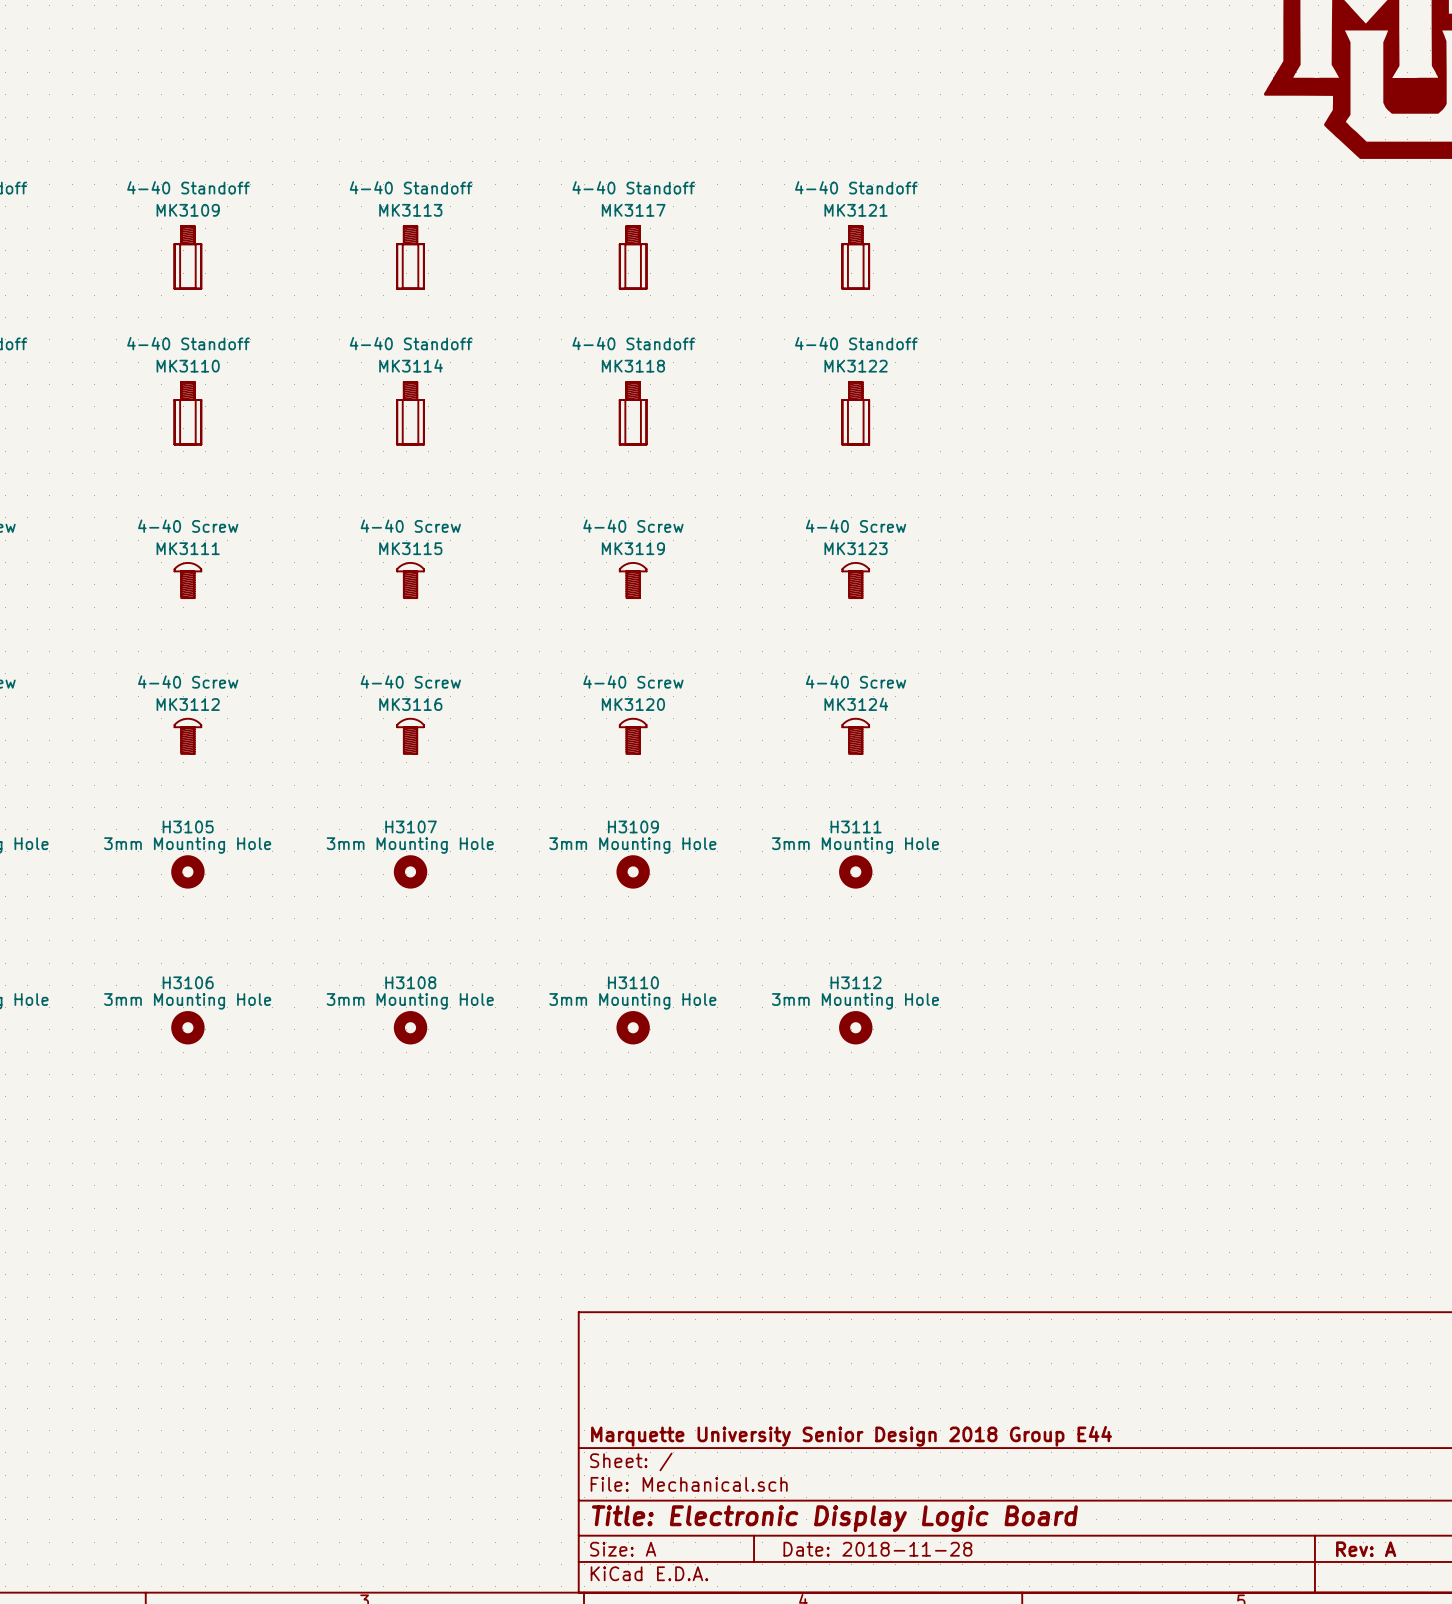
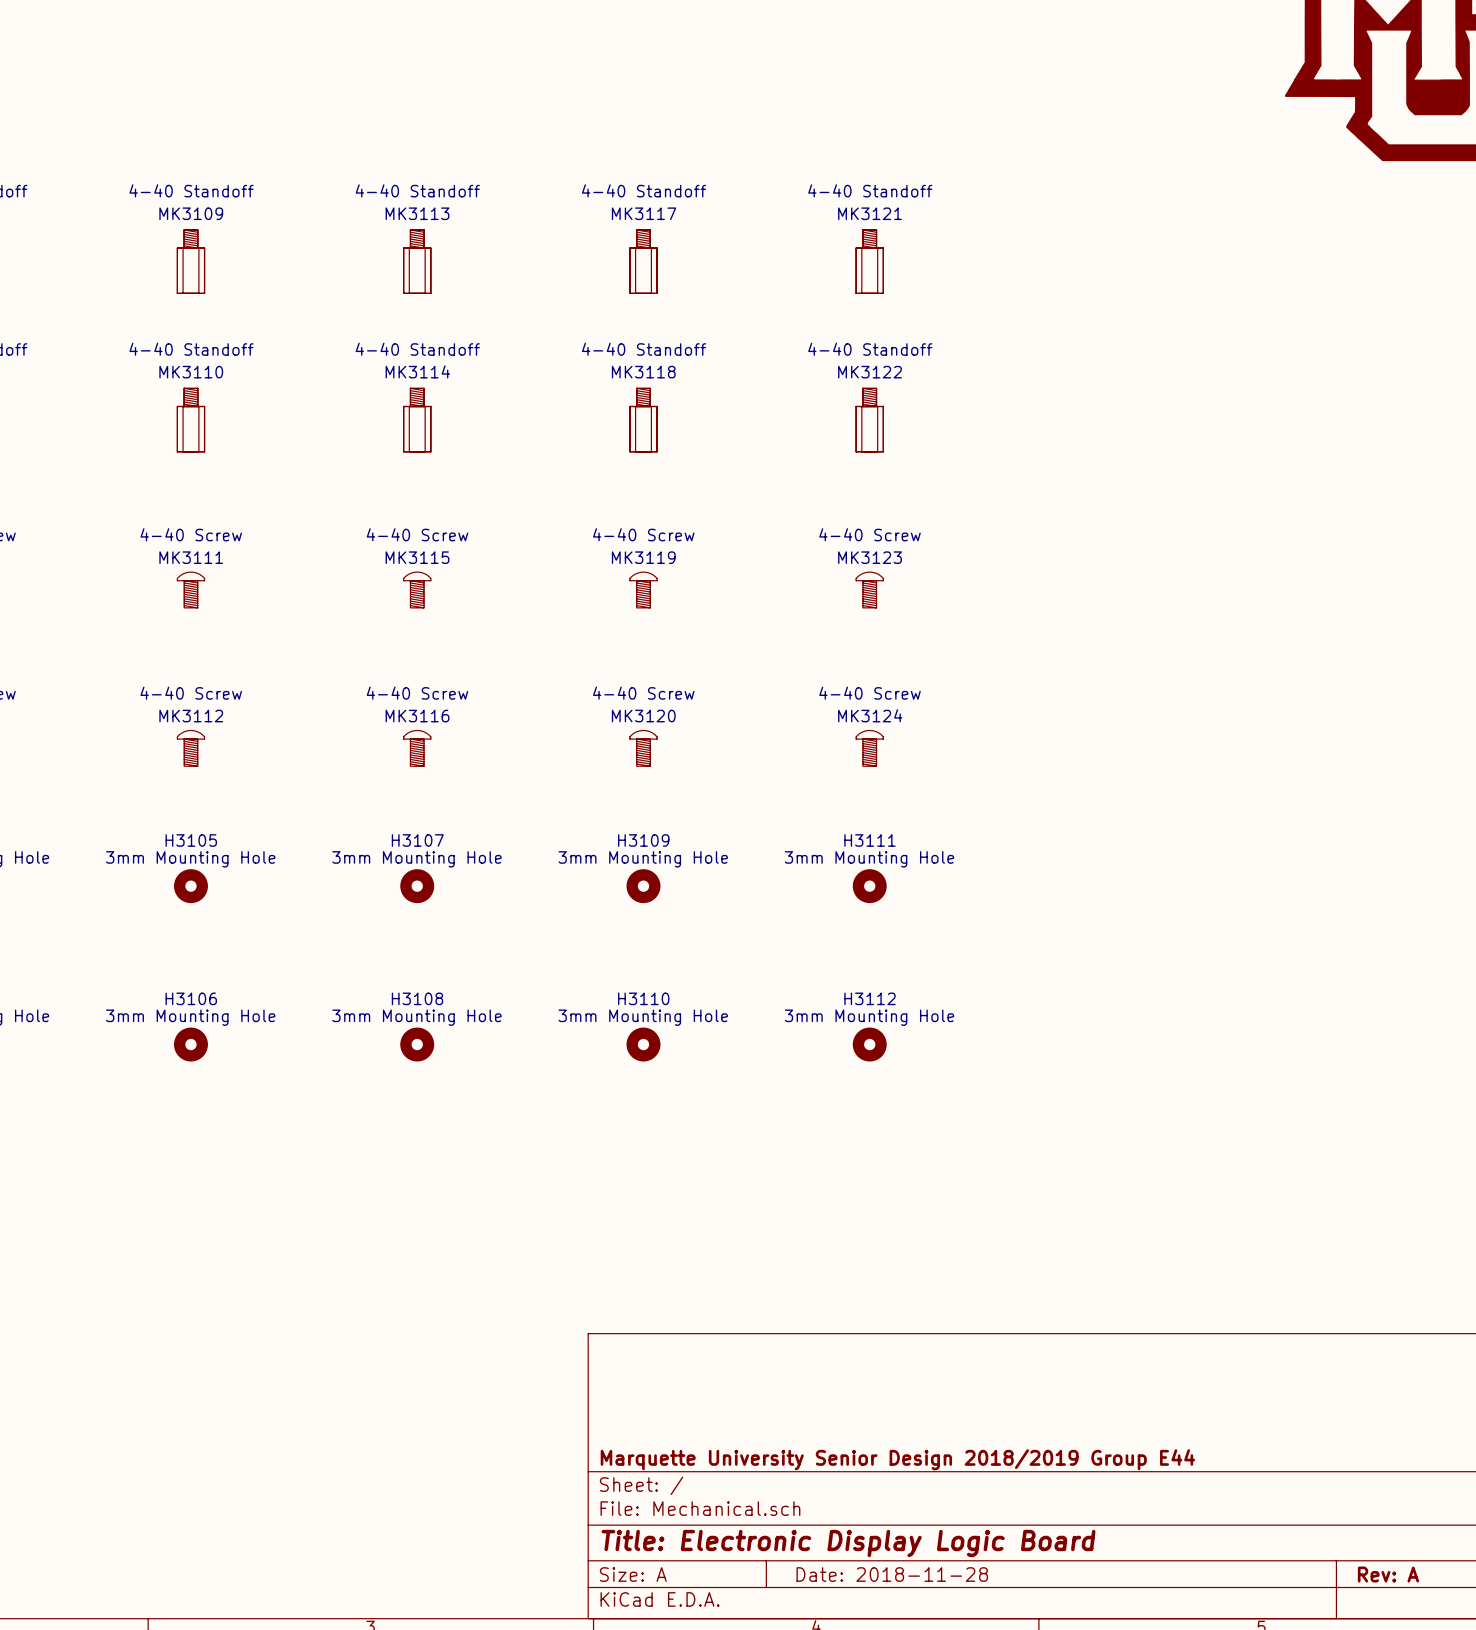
title block: Marquette University Senior Design 2018 Group E44 (851, 1436) -> Marquette University Senior Design 2018/2019 Group E44 (897, 1459)

